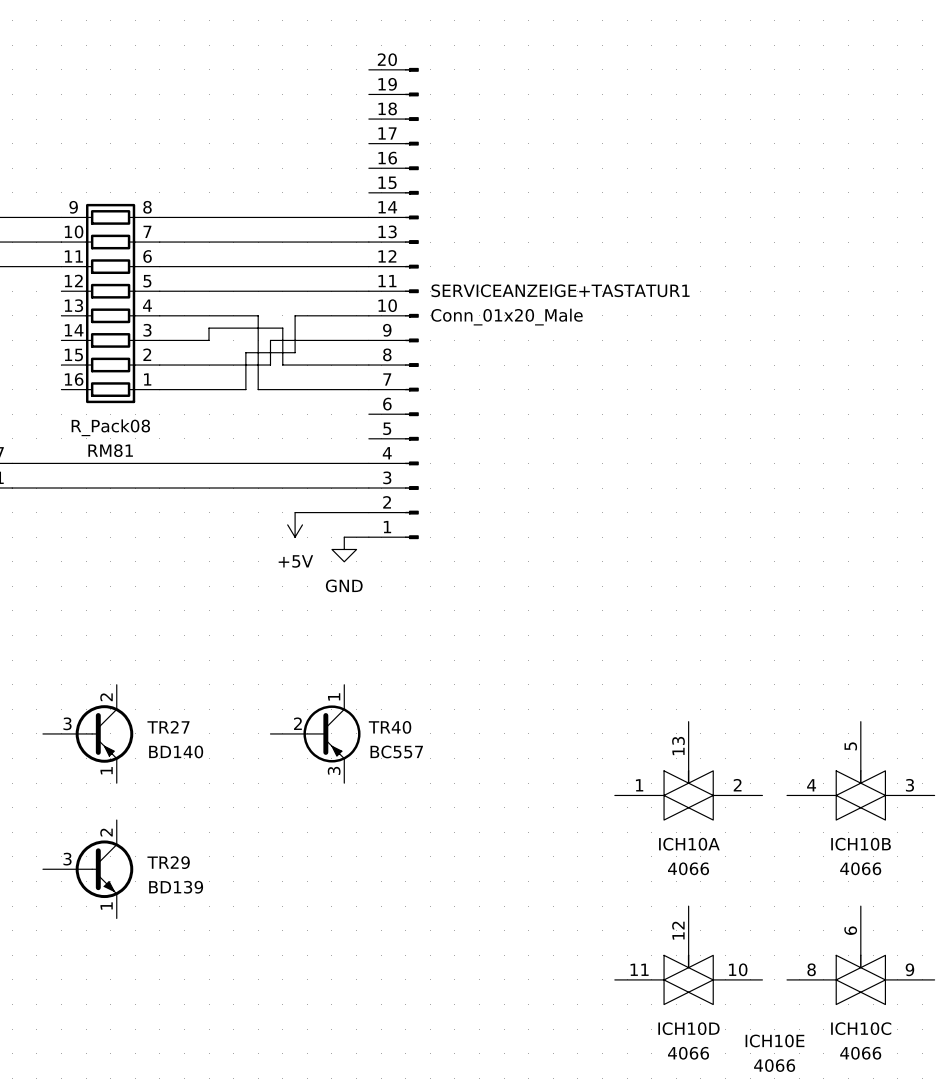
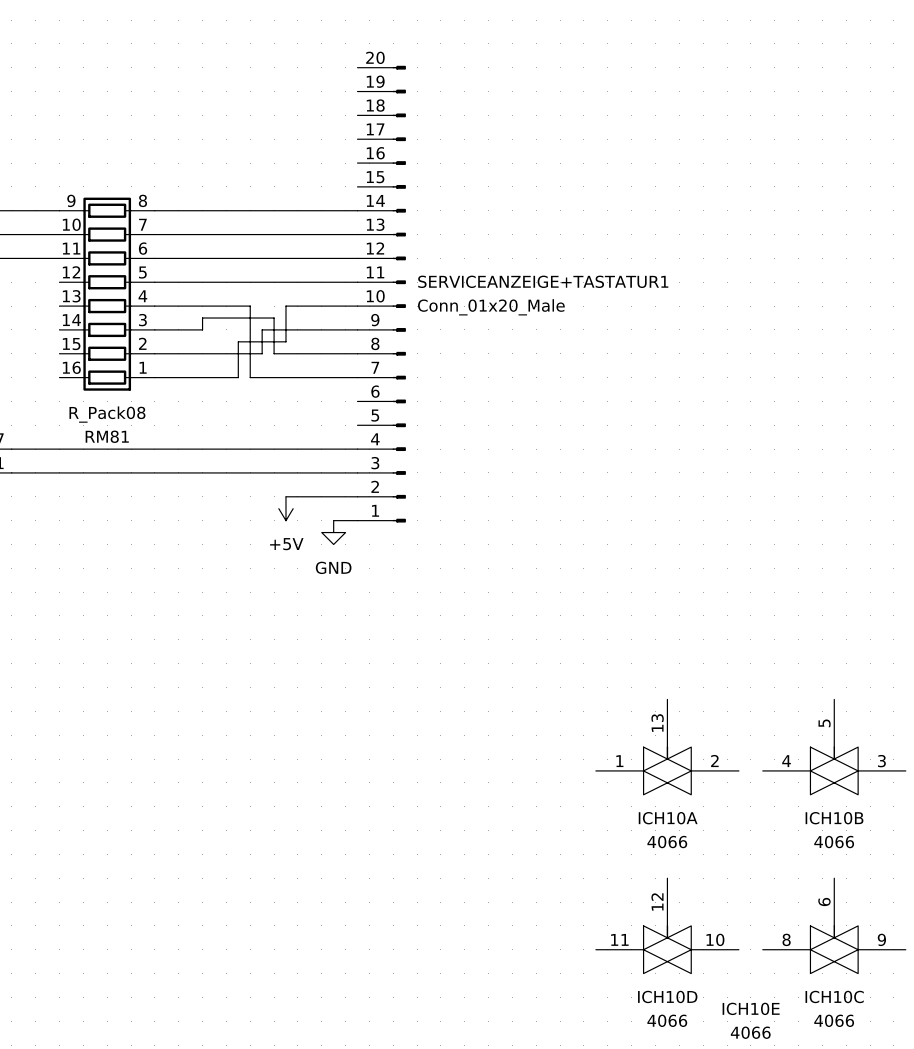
TR27: BD140 (88, 733) -> none
TR40: BC557 (315, 733) -> none
TR29: BD139 (88, 869) -> none

